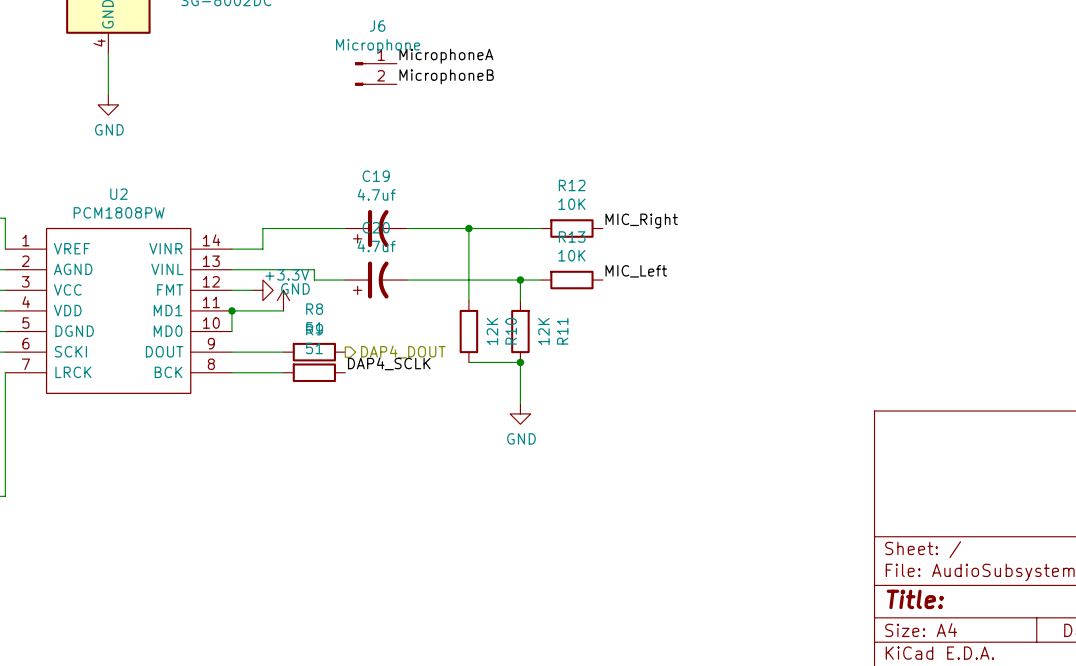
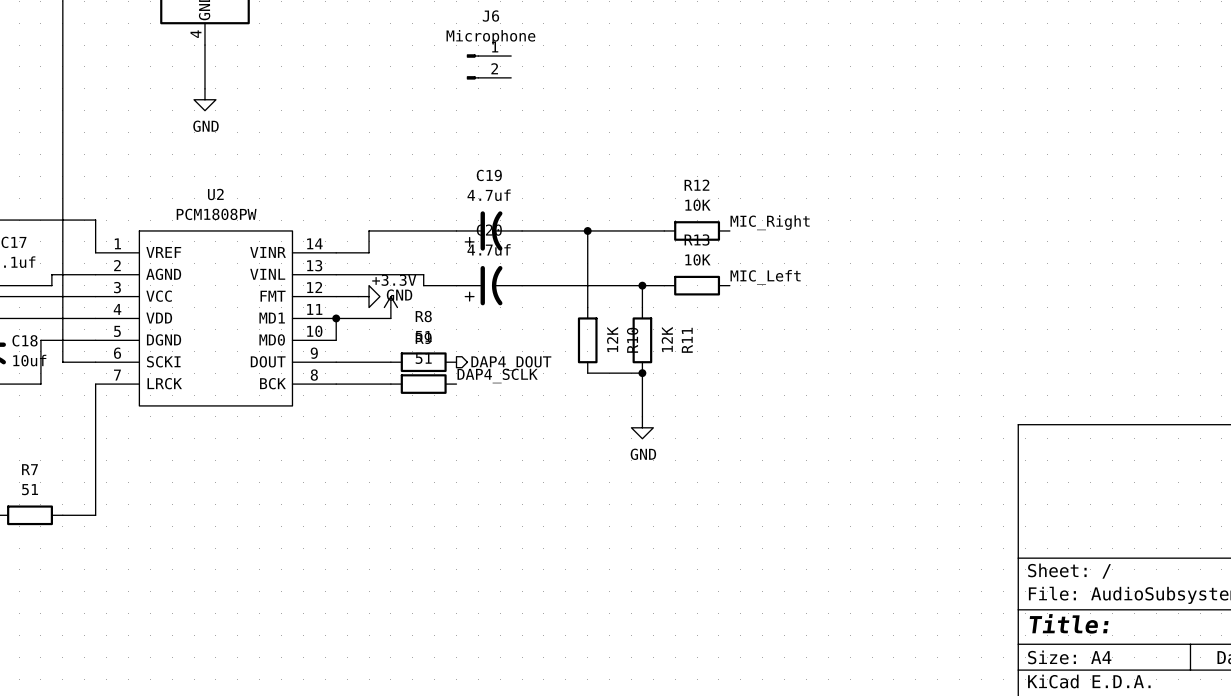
label: MicrophoneA (446, 56) -> none
label: MicrophoneB (446, 76) -> none

